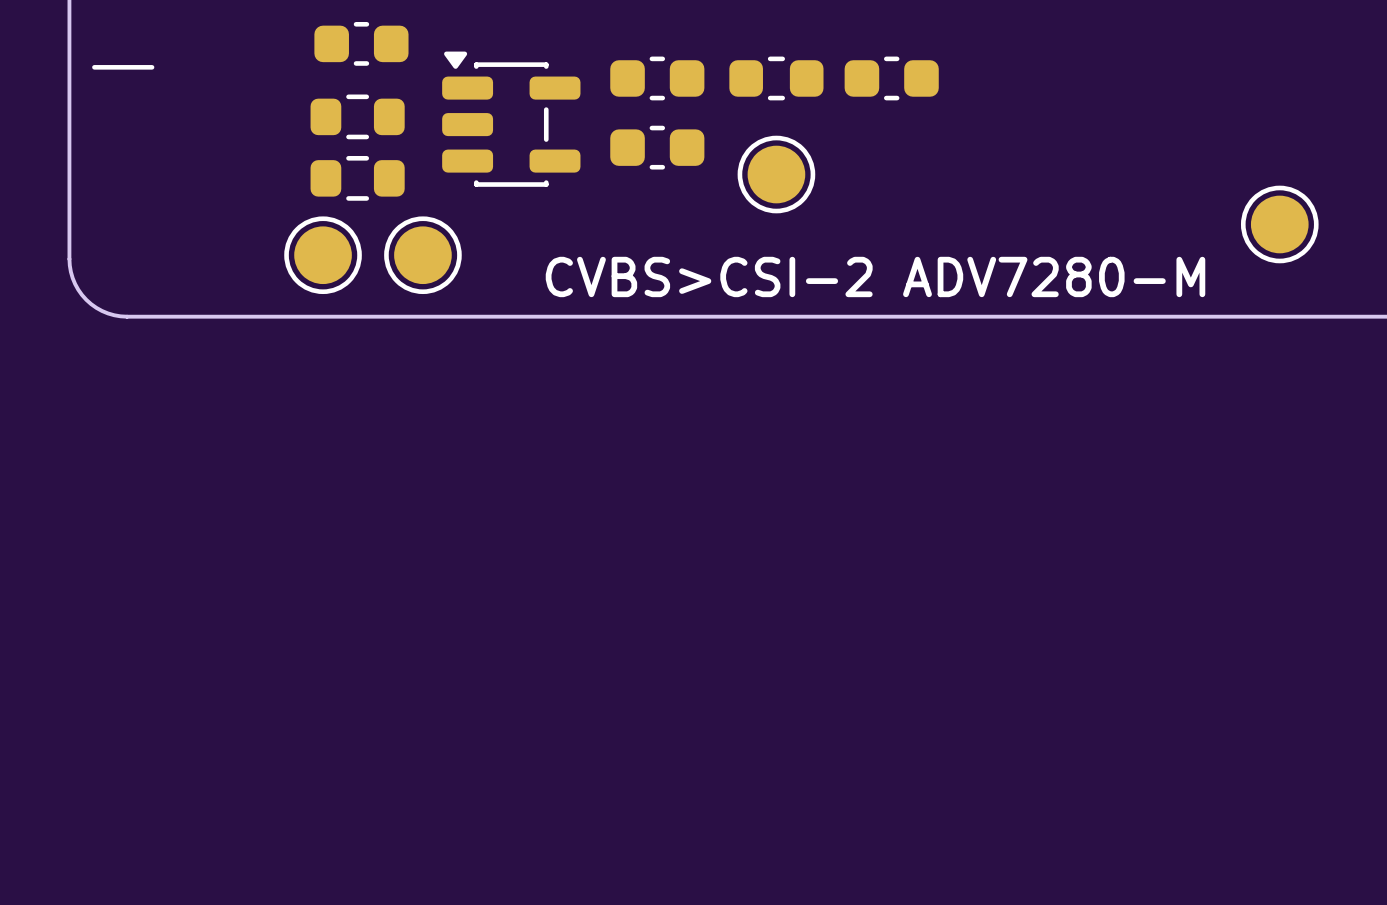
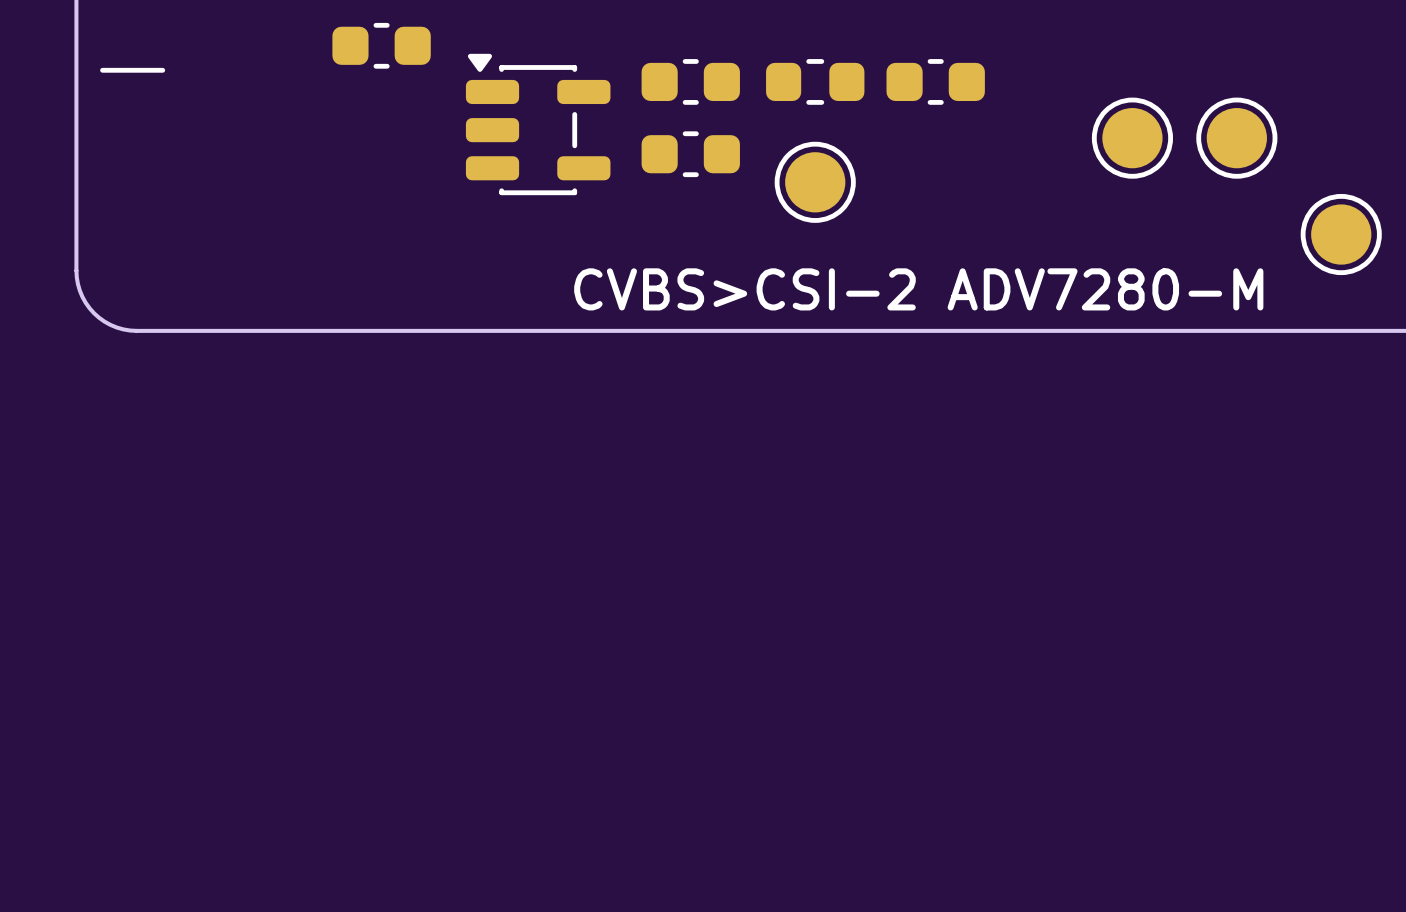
part: (357, 116) -> none
part: none -> (1132, 138)
part: none -> (1236, 138)
part: (357, 178) -> none
part: (323, 255) -> none
part: (422, 255) -> none

